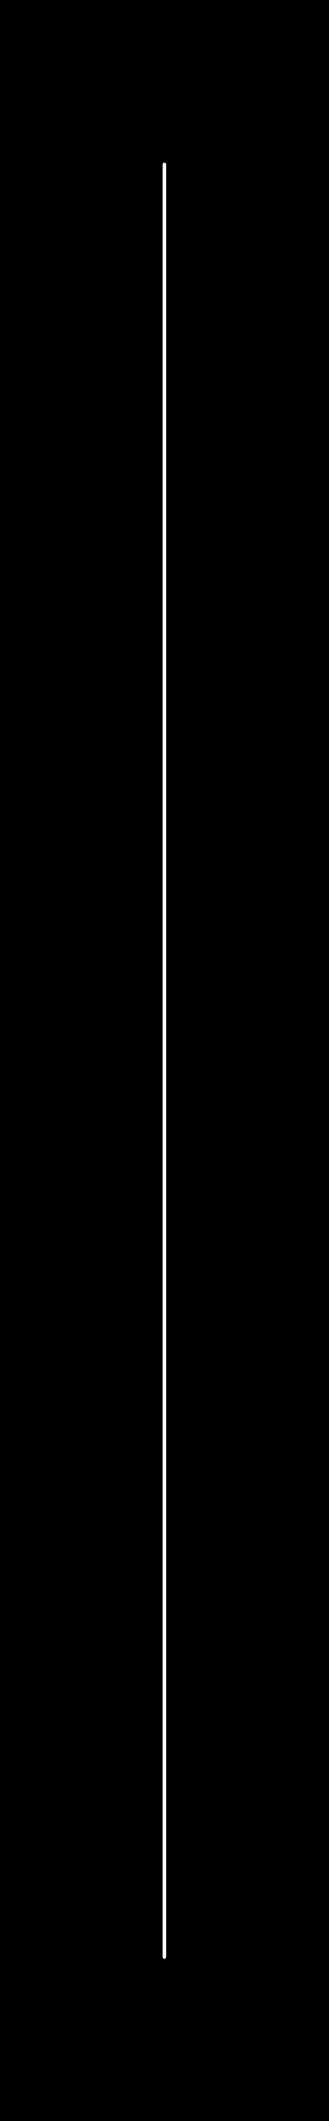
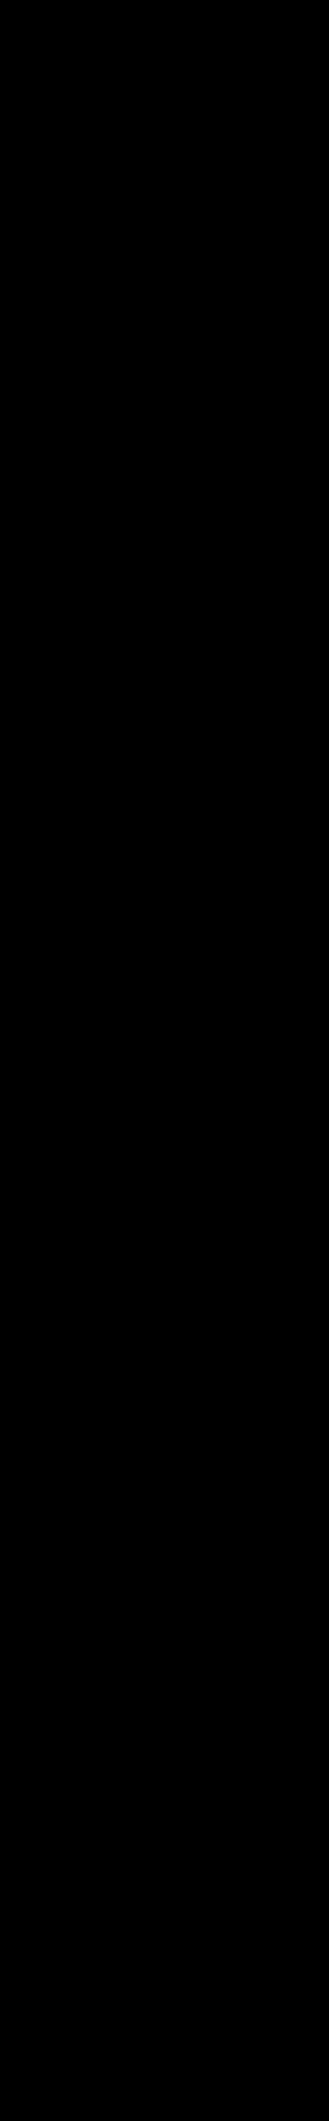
board edge: (164, 164) (164, 1957) -> none

